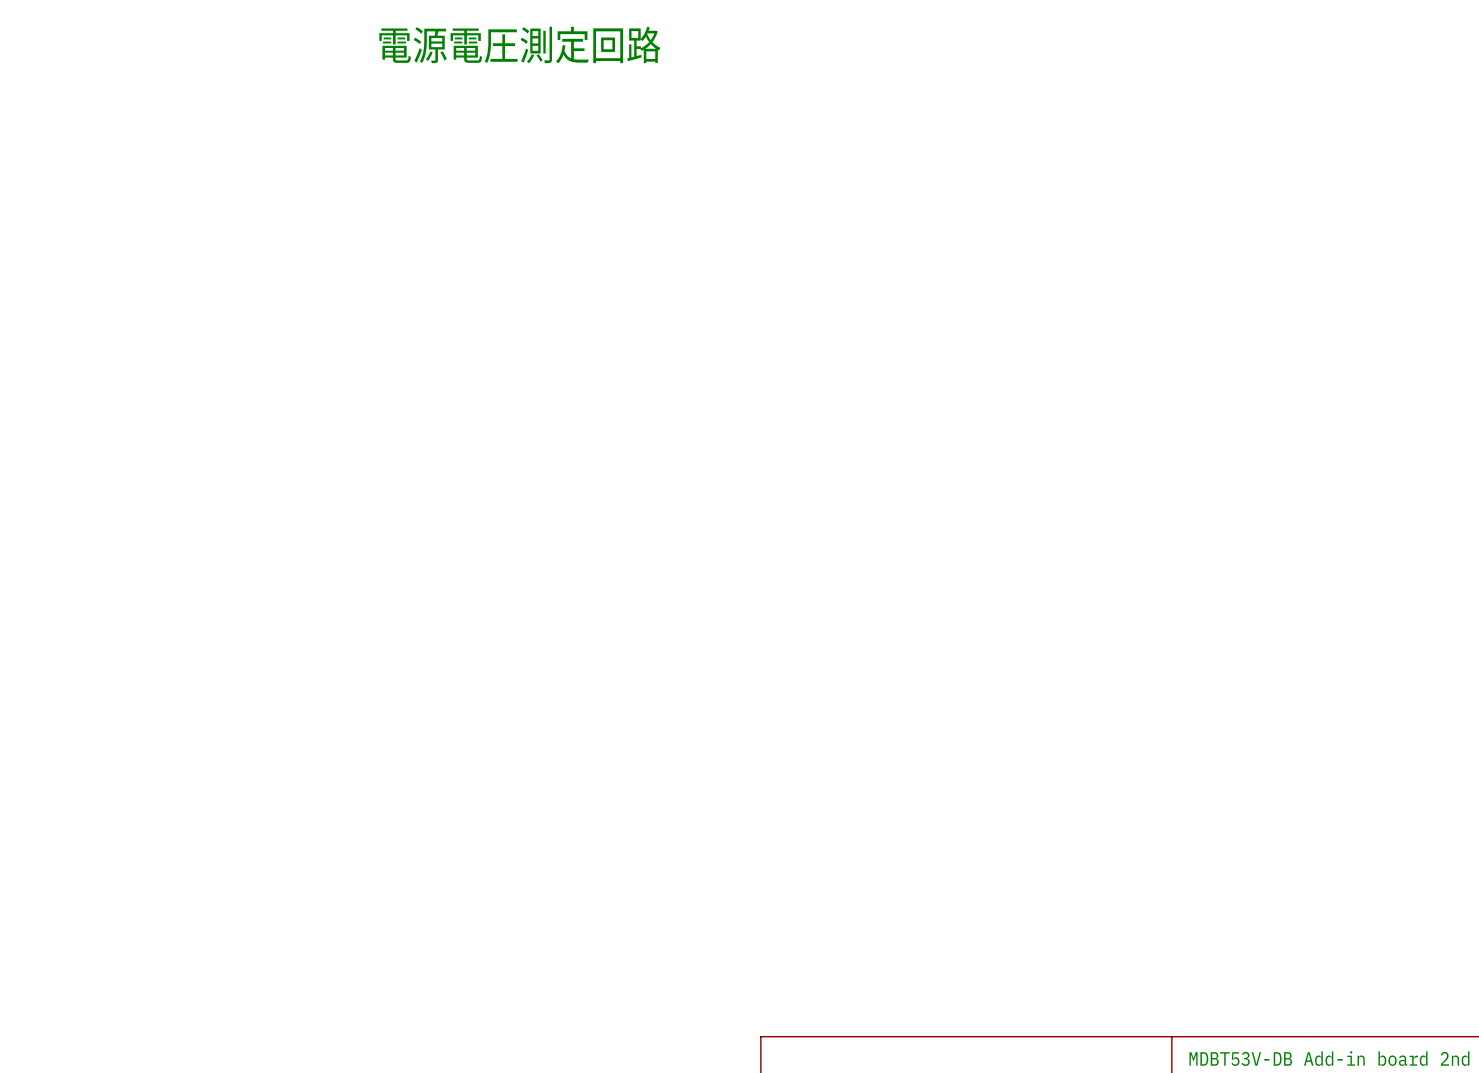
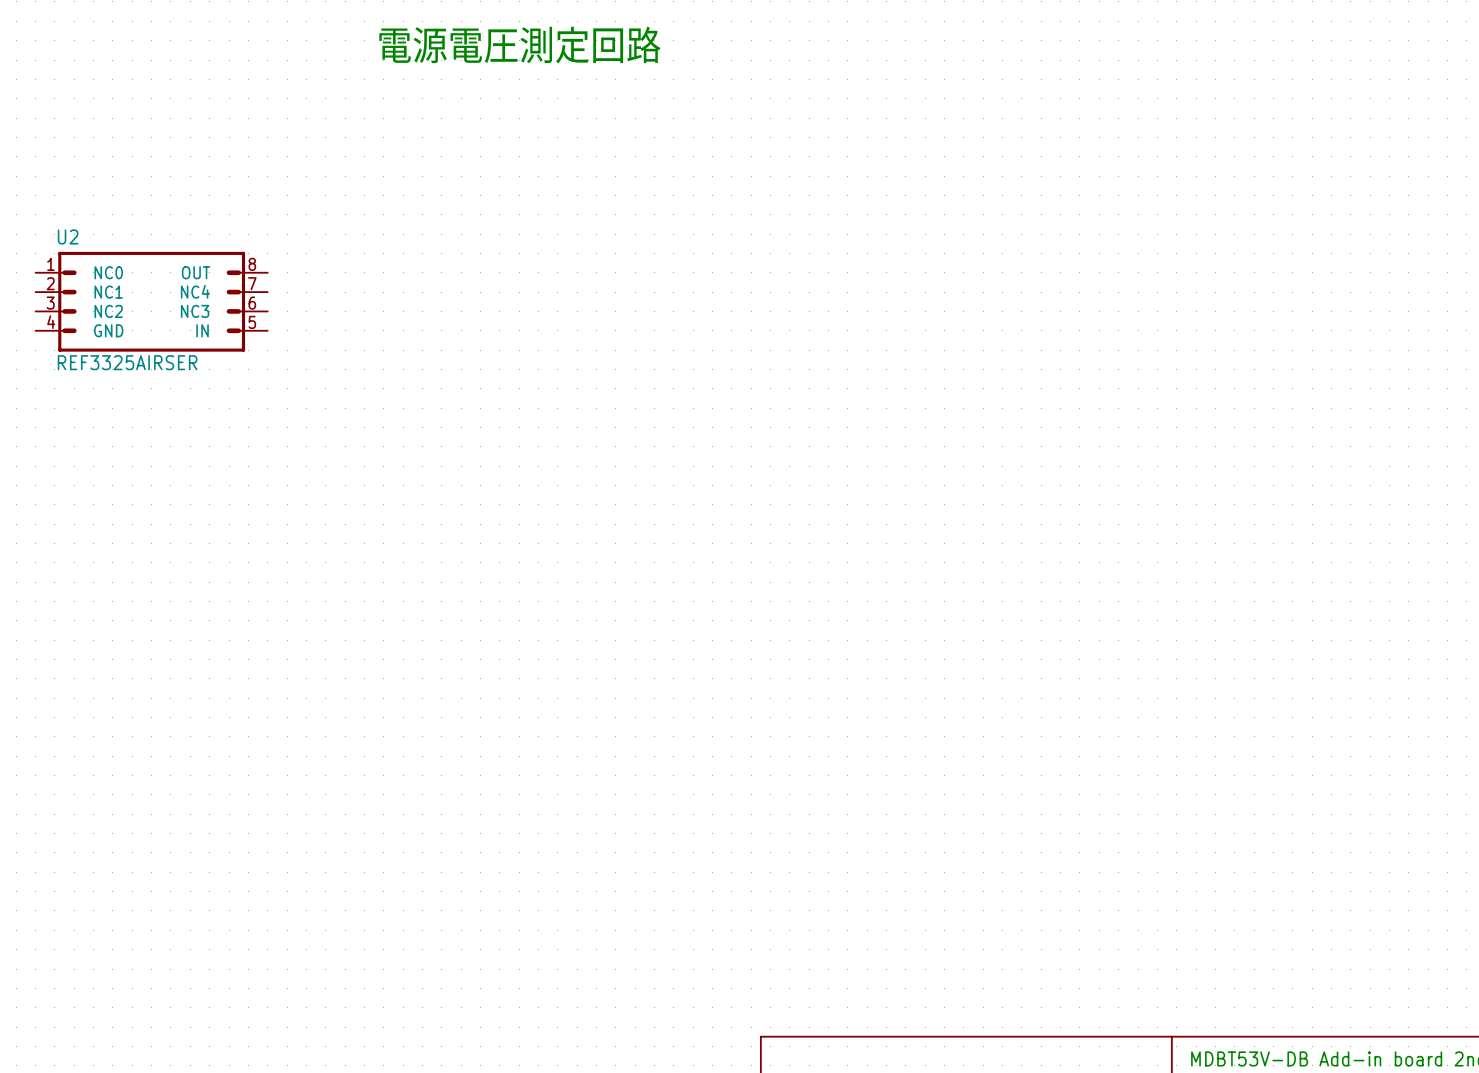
U2: none -> REF3325AIRSER (151, 301)

